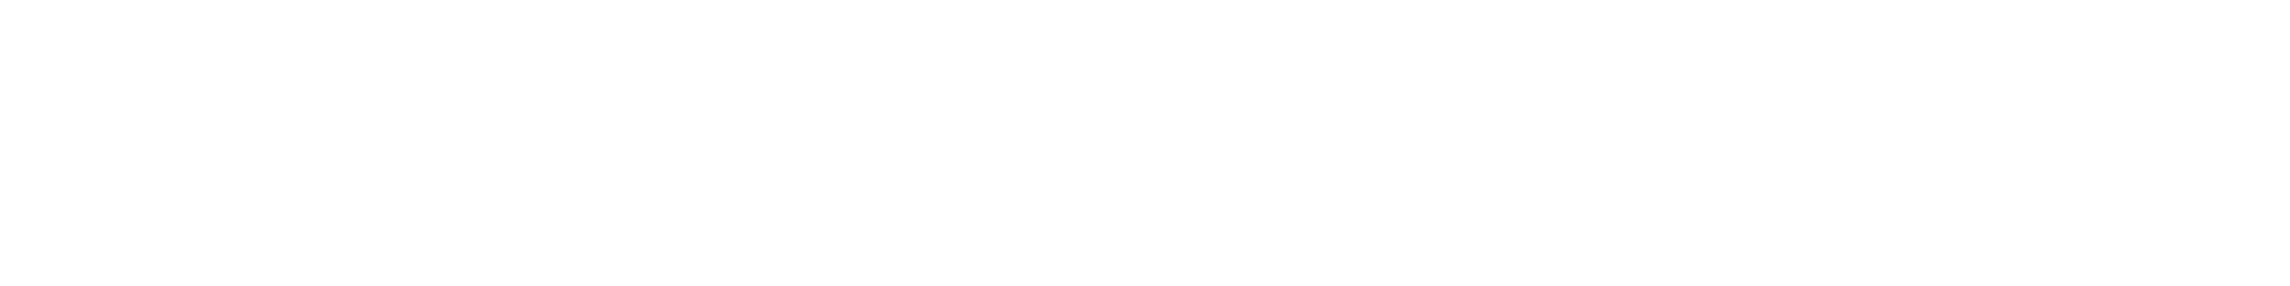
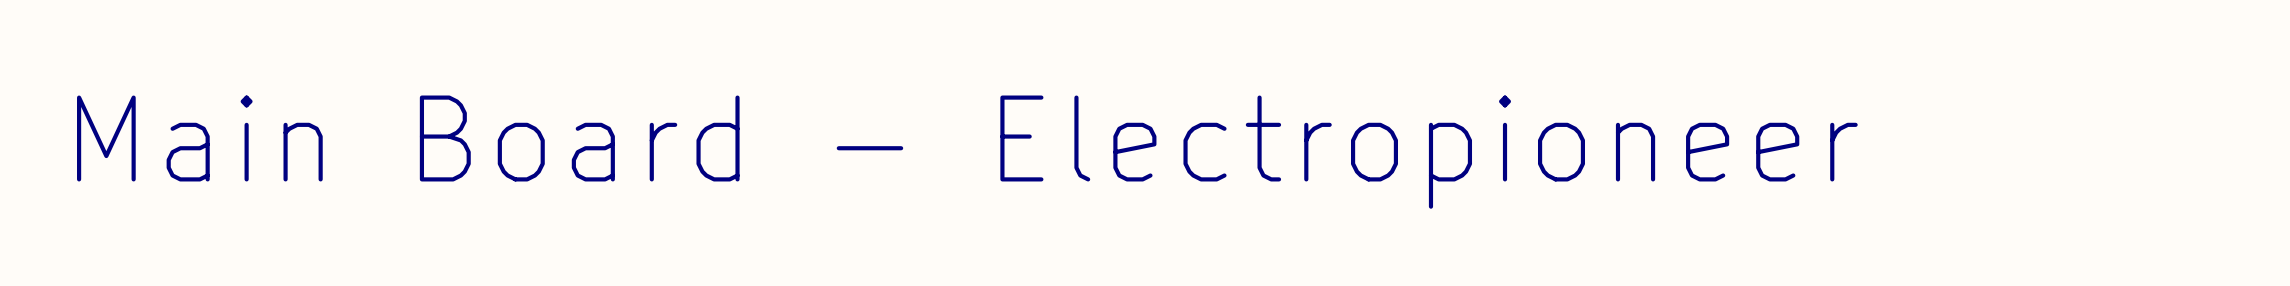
text: none -> Main Board - Electropioneer (967, 152)

